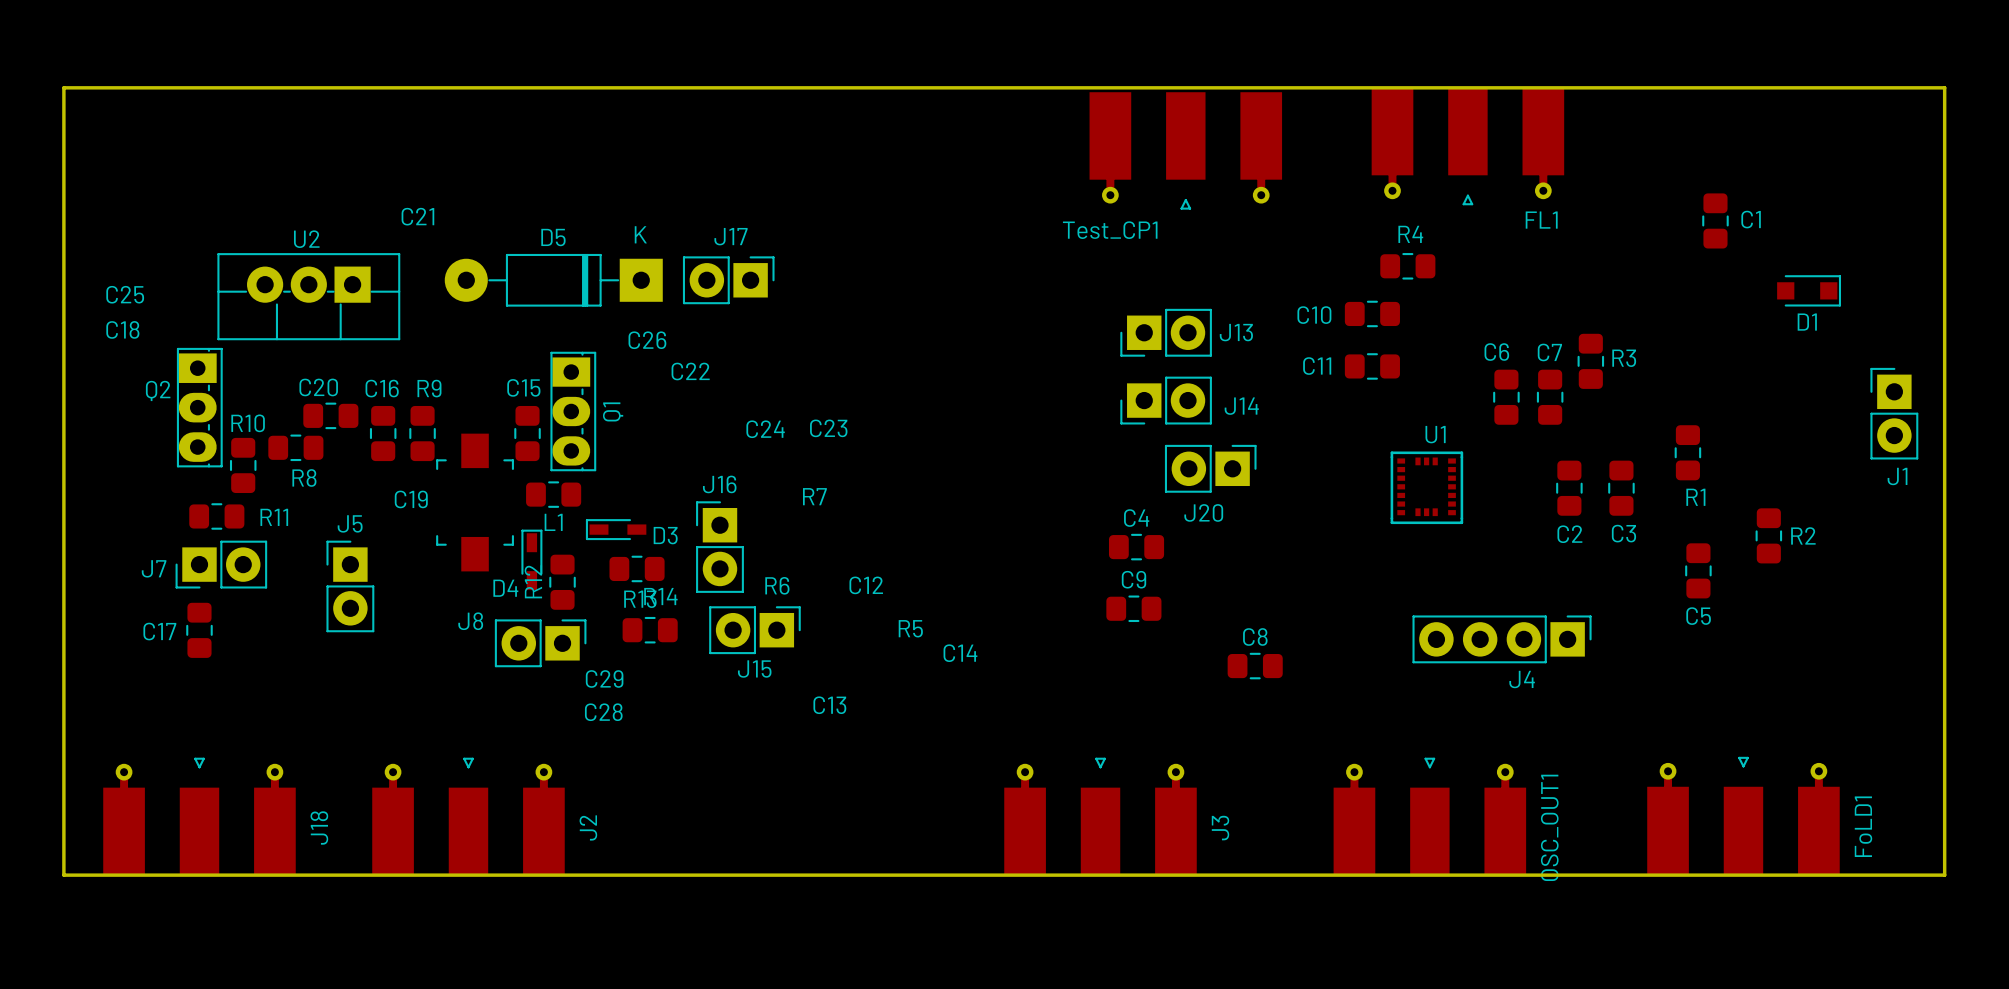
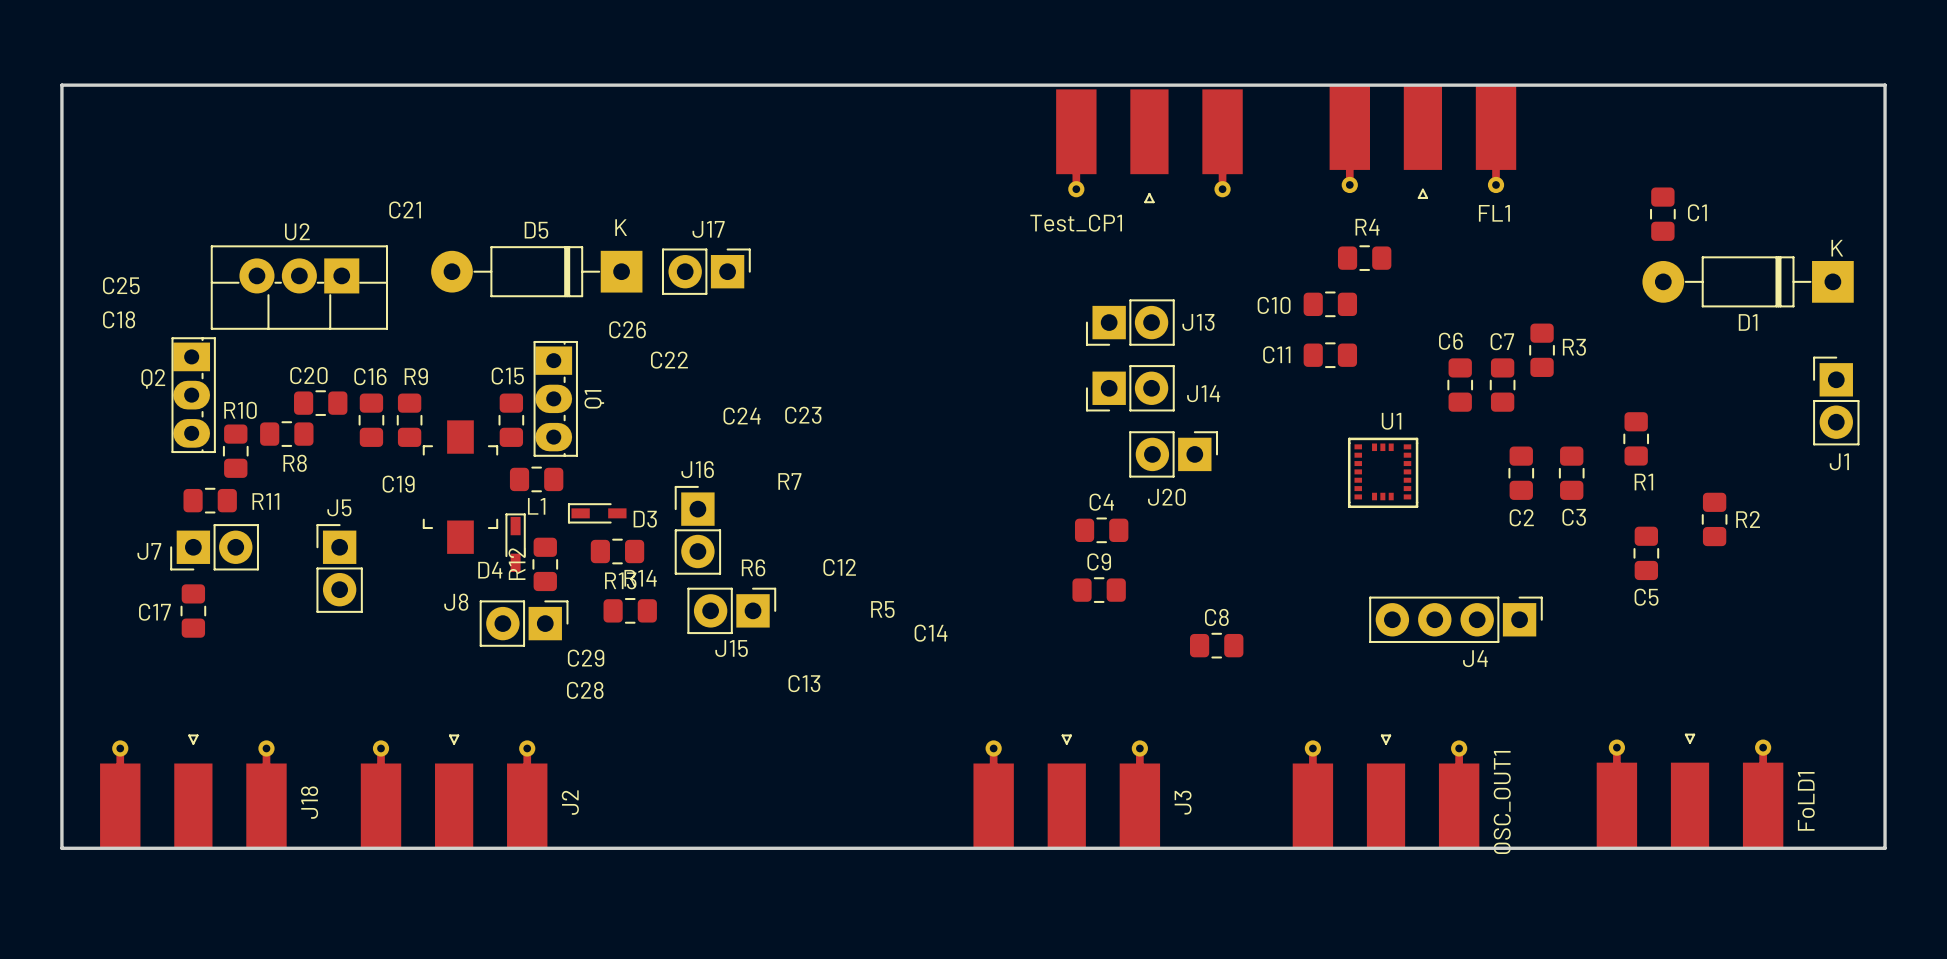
D1 footprint: [1777, 275, 1842, 307] -> [1642, 256, 1854, 308]

